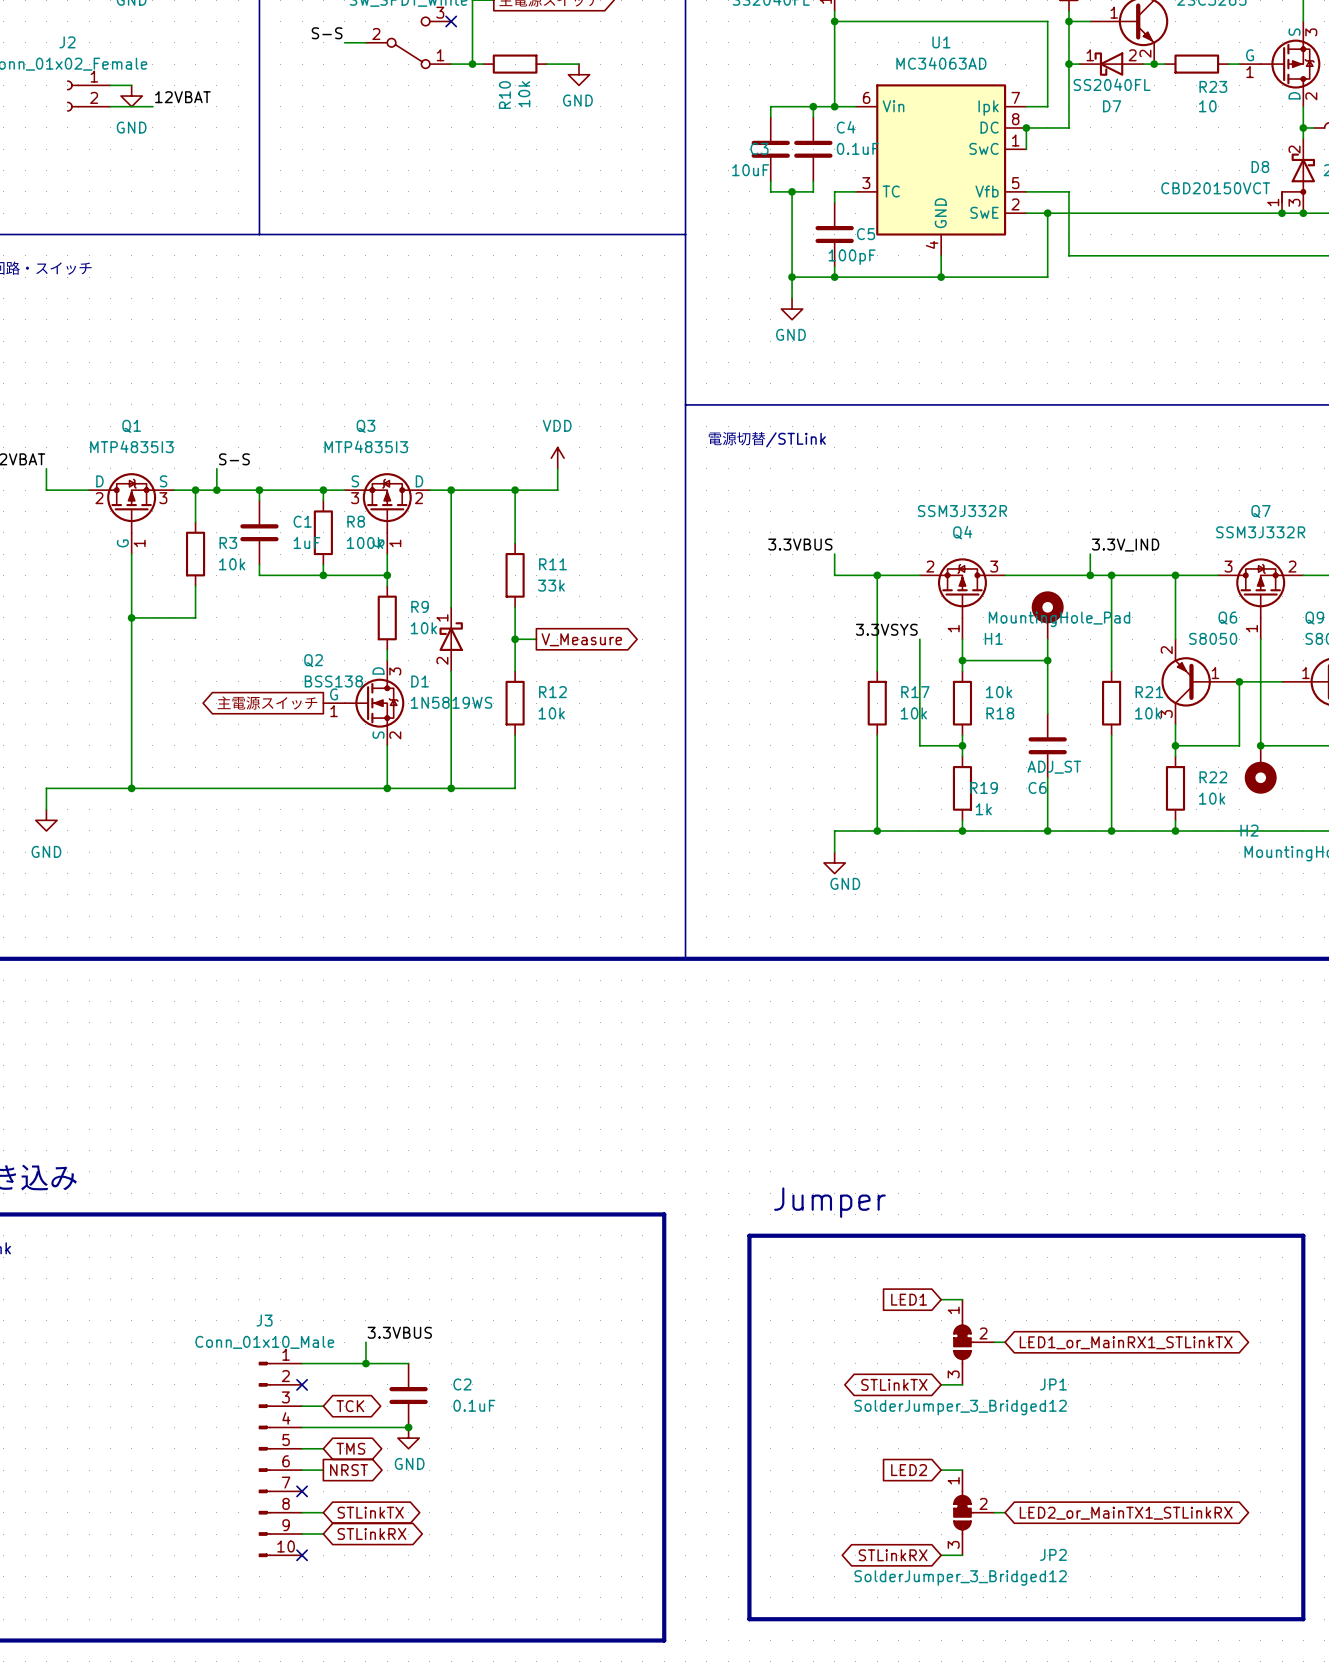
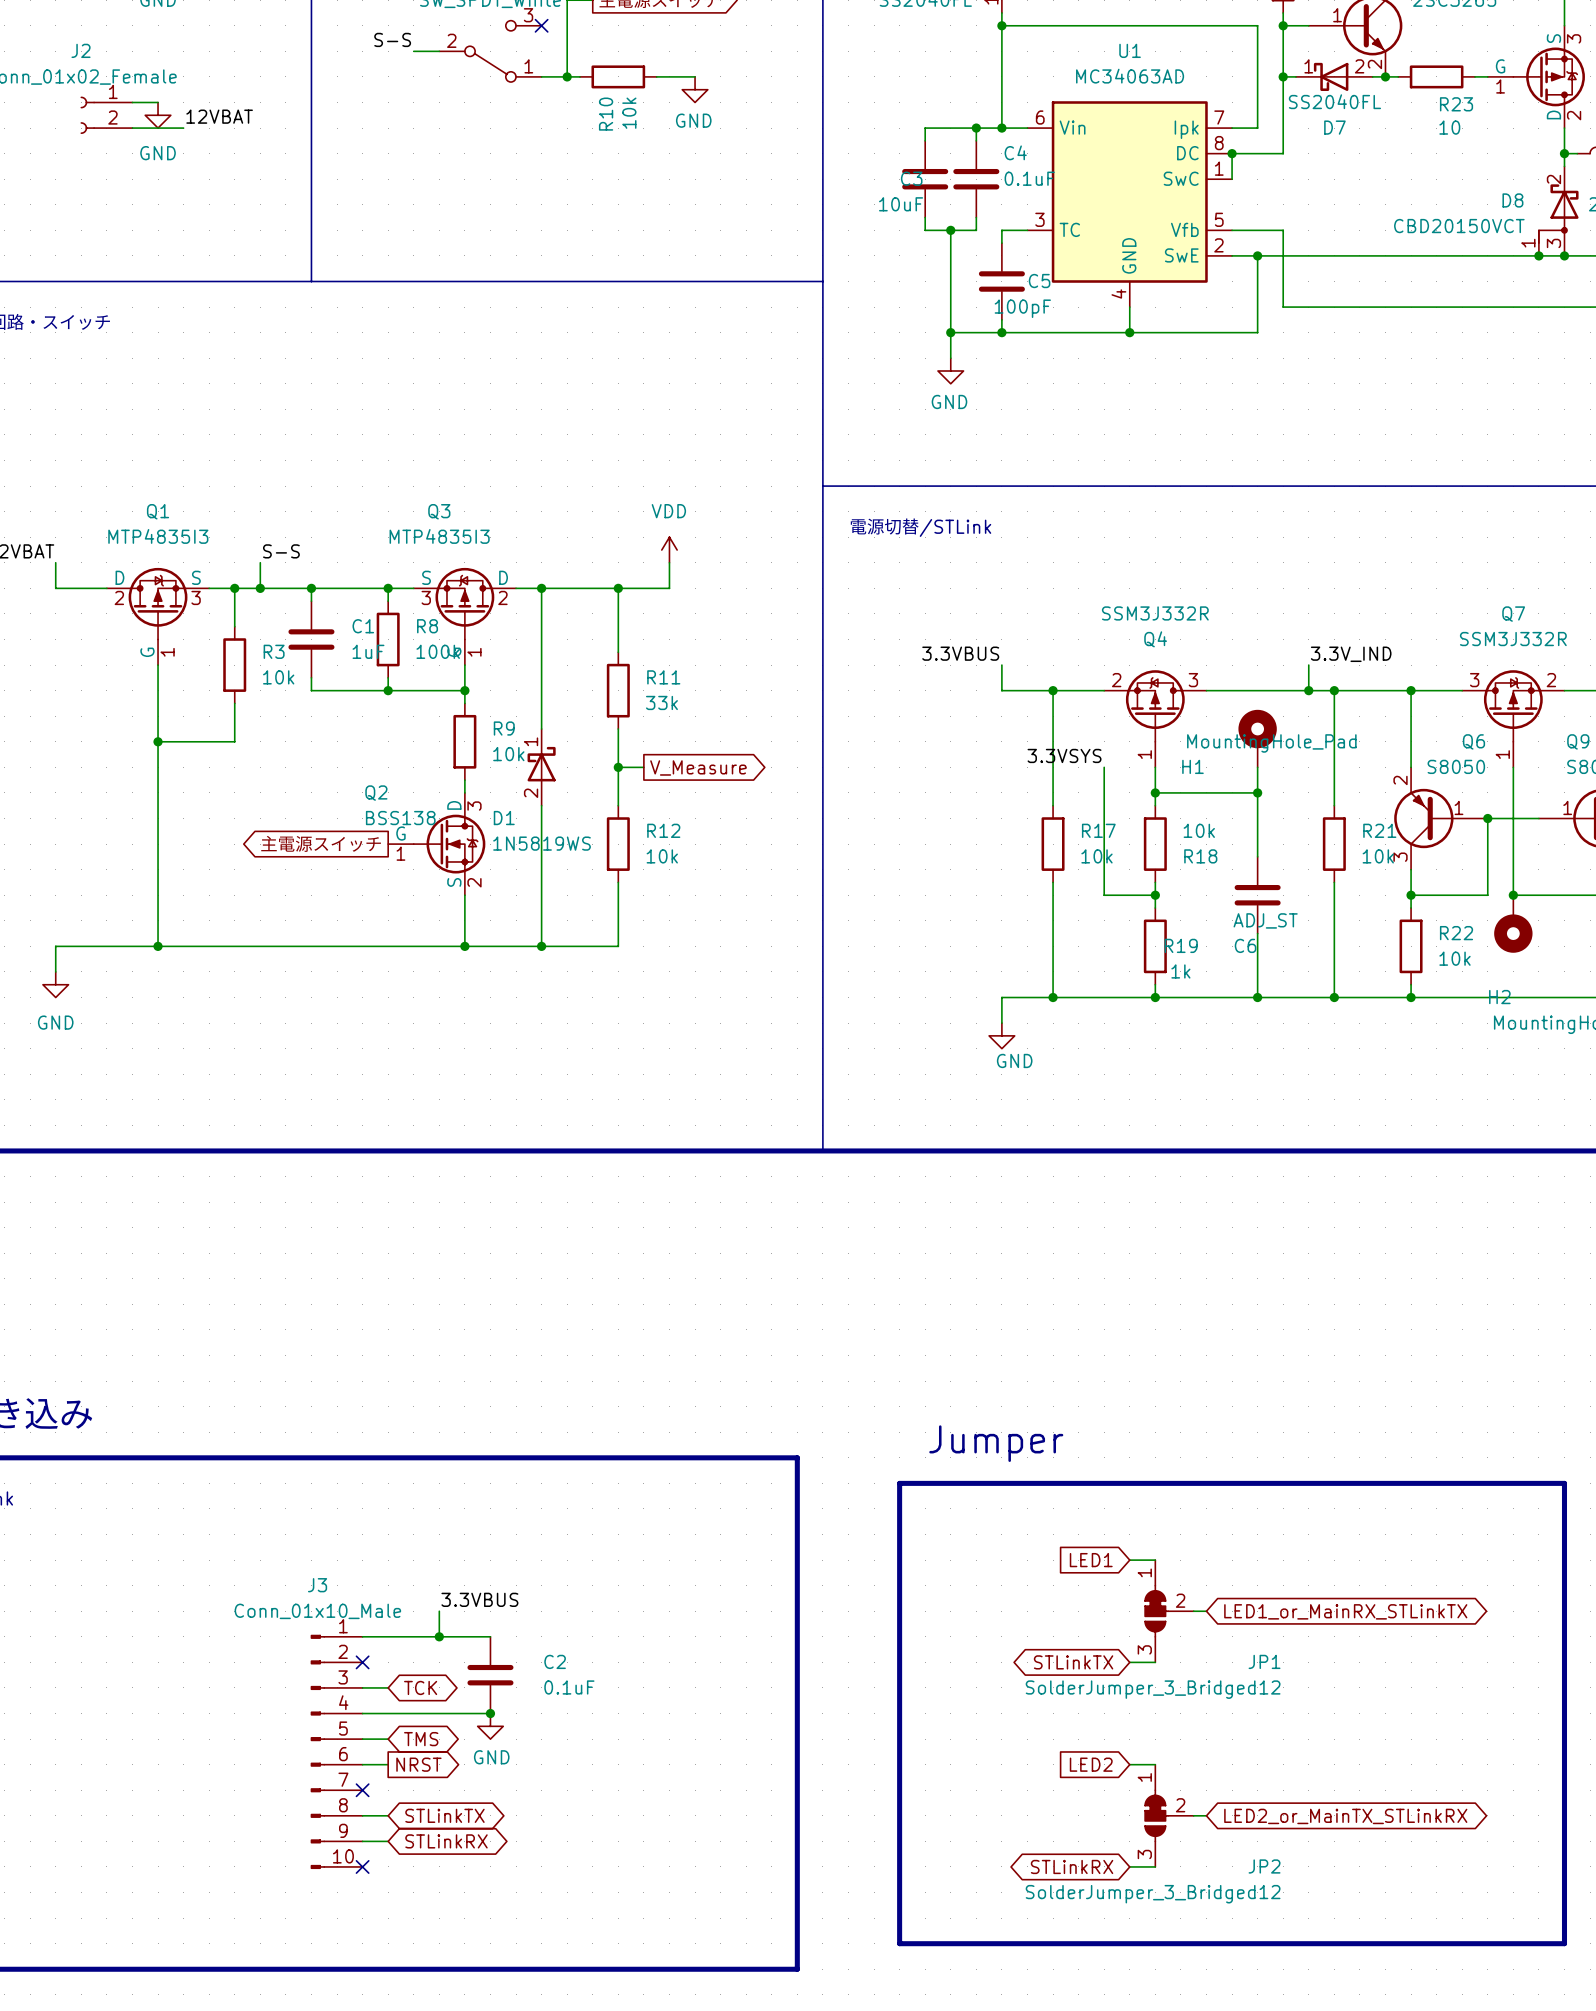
global label: LED1_or_MainRX1_STLinkTX (1126, 1342) -> LED1_or_MainRX_STLinkTX (1345, 1611)
global label: LED2_or_MainTX1_STLinkRX (1126, 1513) -> LED2_or_MainTX_STLinkRX (1345, 1816)

